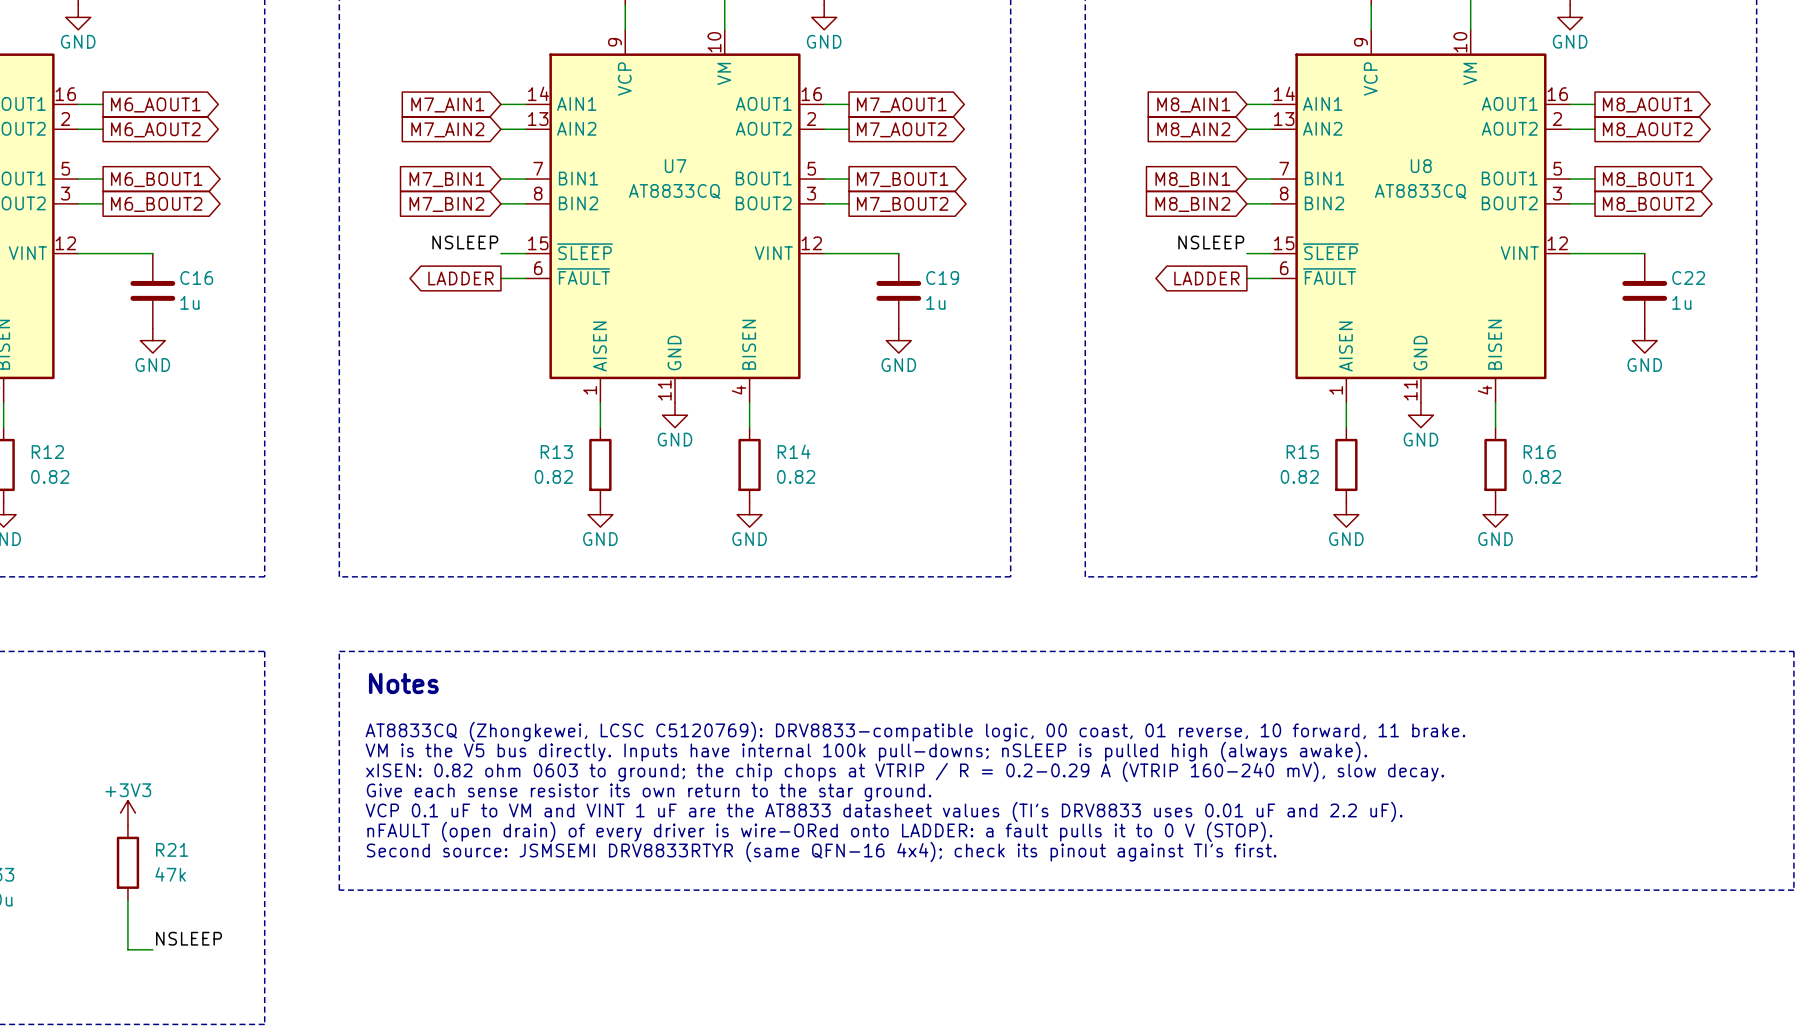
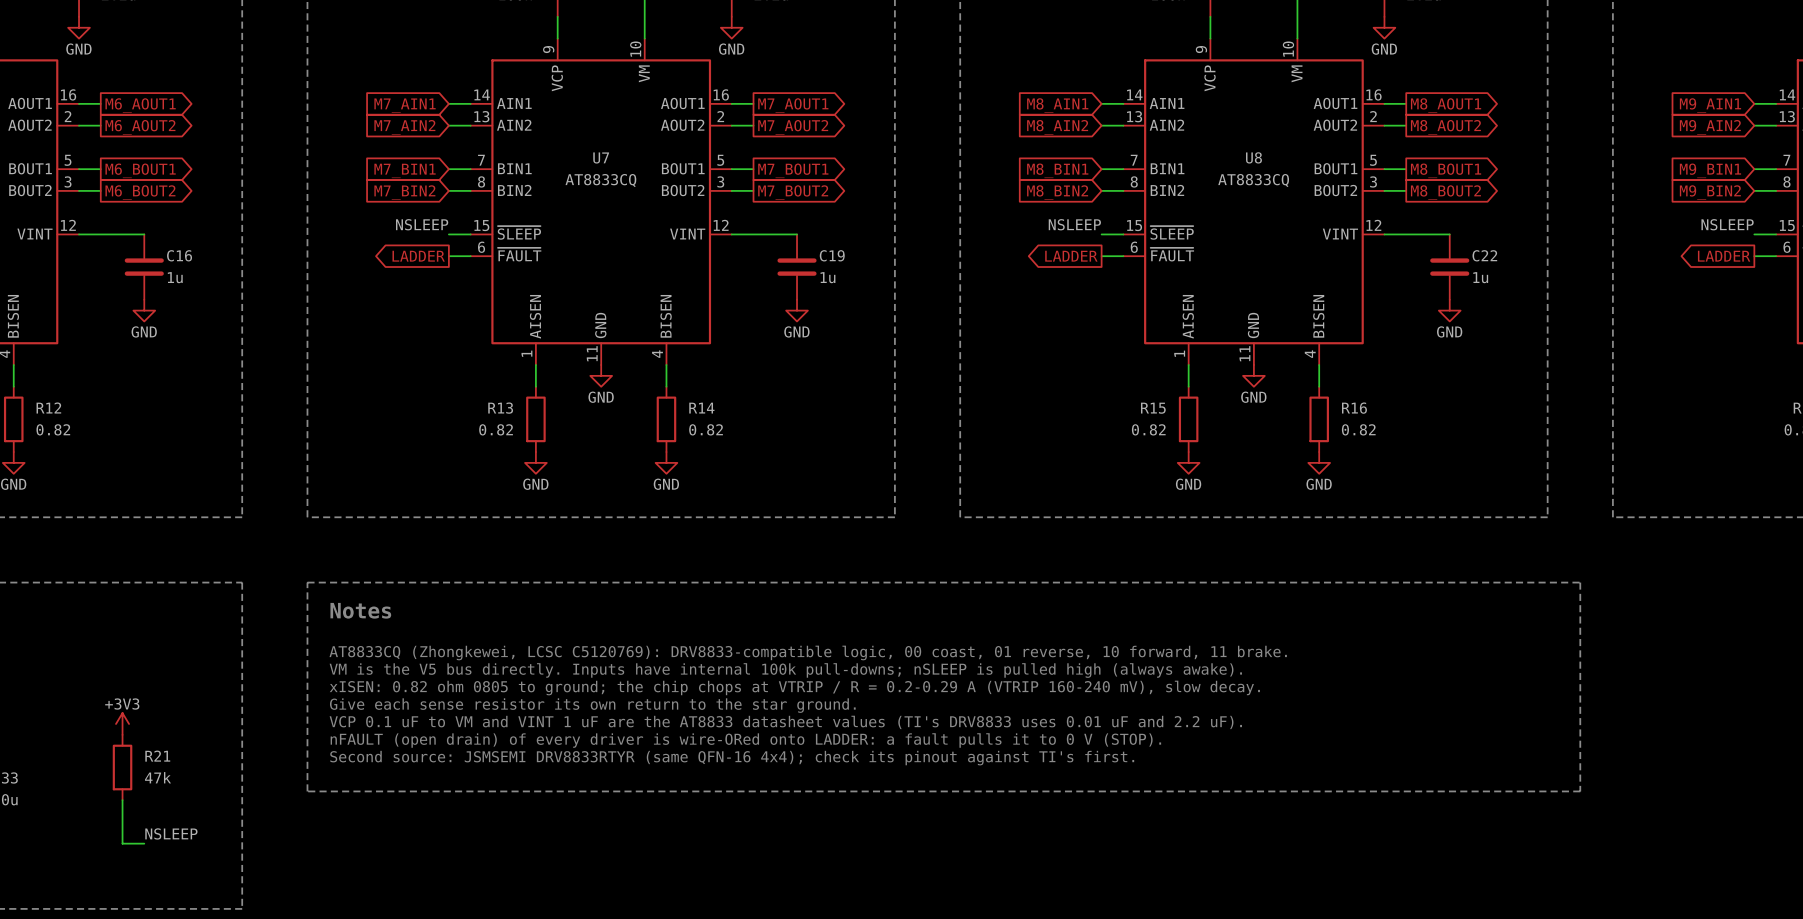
text: xISEN: 0.82 ohm 0603 to ground; the chip chops at VTRIP / R = 0.2-0.29 A (VTRIP 160-240 mV), slow decay. (905, 771) -> xISEN: 0.82 ohm 0805 to ground; the chip chops at VTRIP / R = 0.2-0.29 A (VTRIP 160-240 mV), slow decay. (794, 688)

